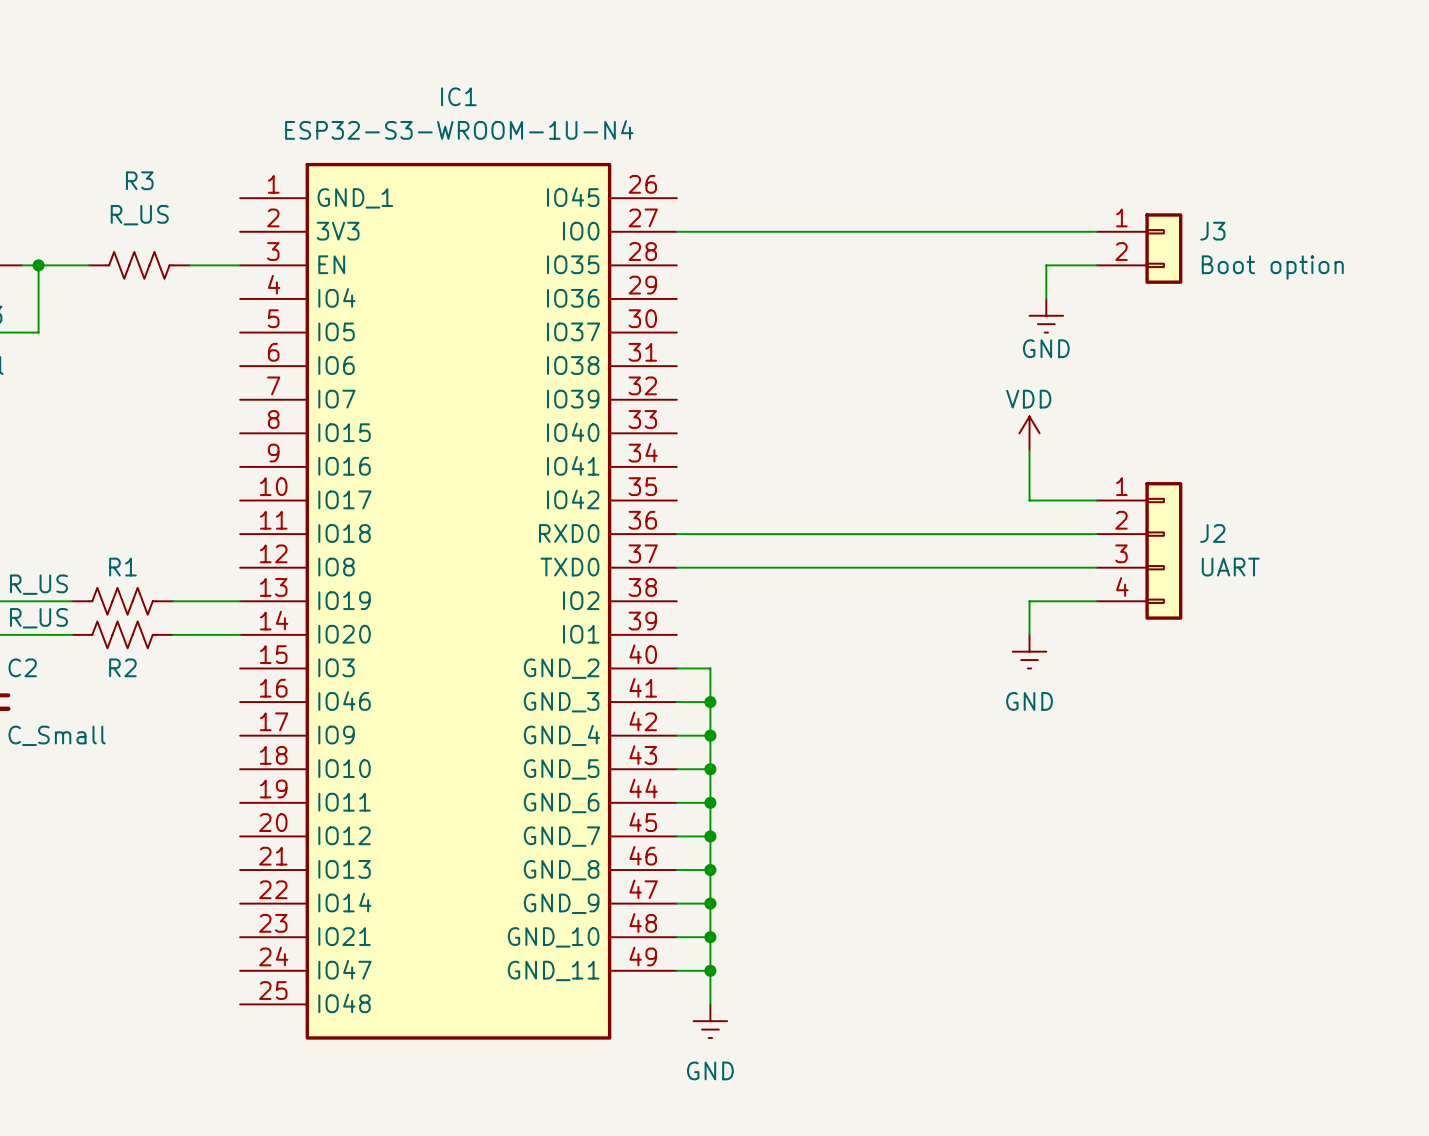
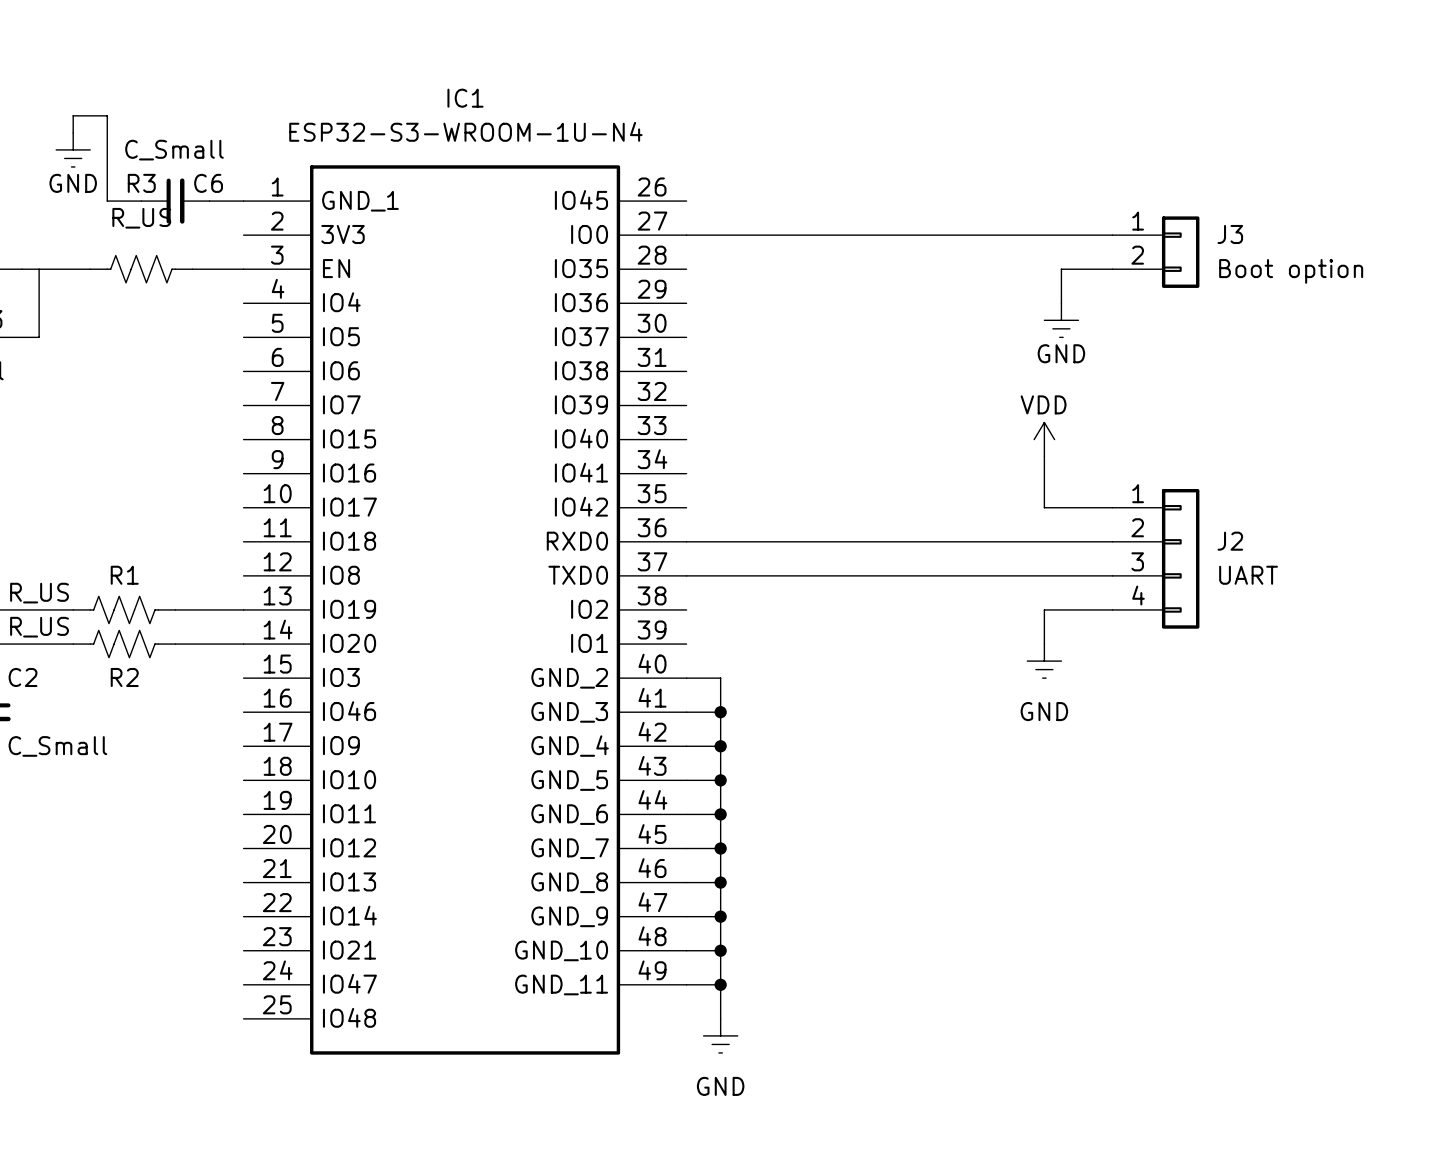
wire: none -> (73, 132) (73, 115) (107, 115) (107, 201) (141, 201)
power symbol: none -> GND (73, 149)
C6: none -> C_Small (175, 201)
wire: none -> (209, 201) (243, 201)
junction: (38, 265) -> none

